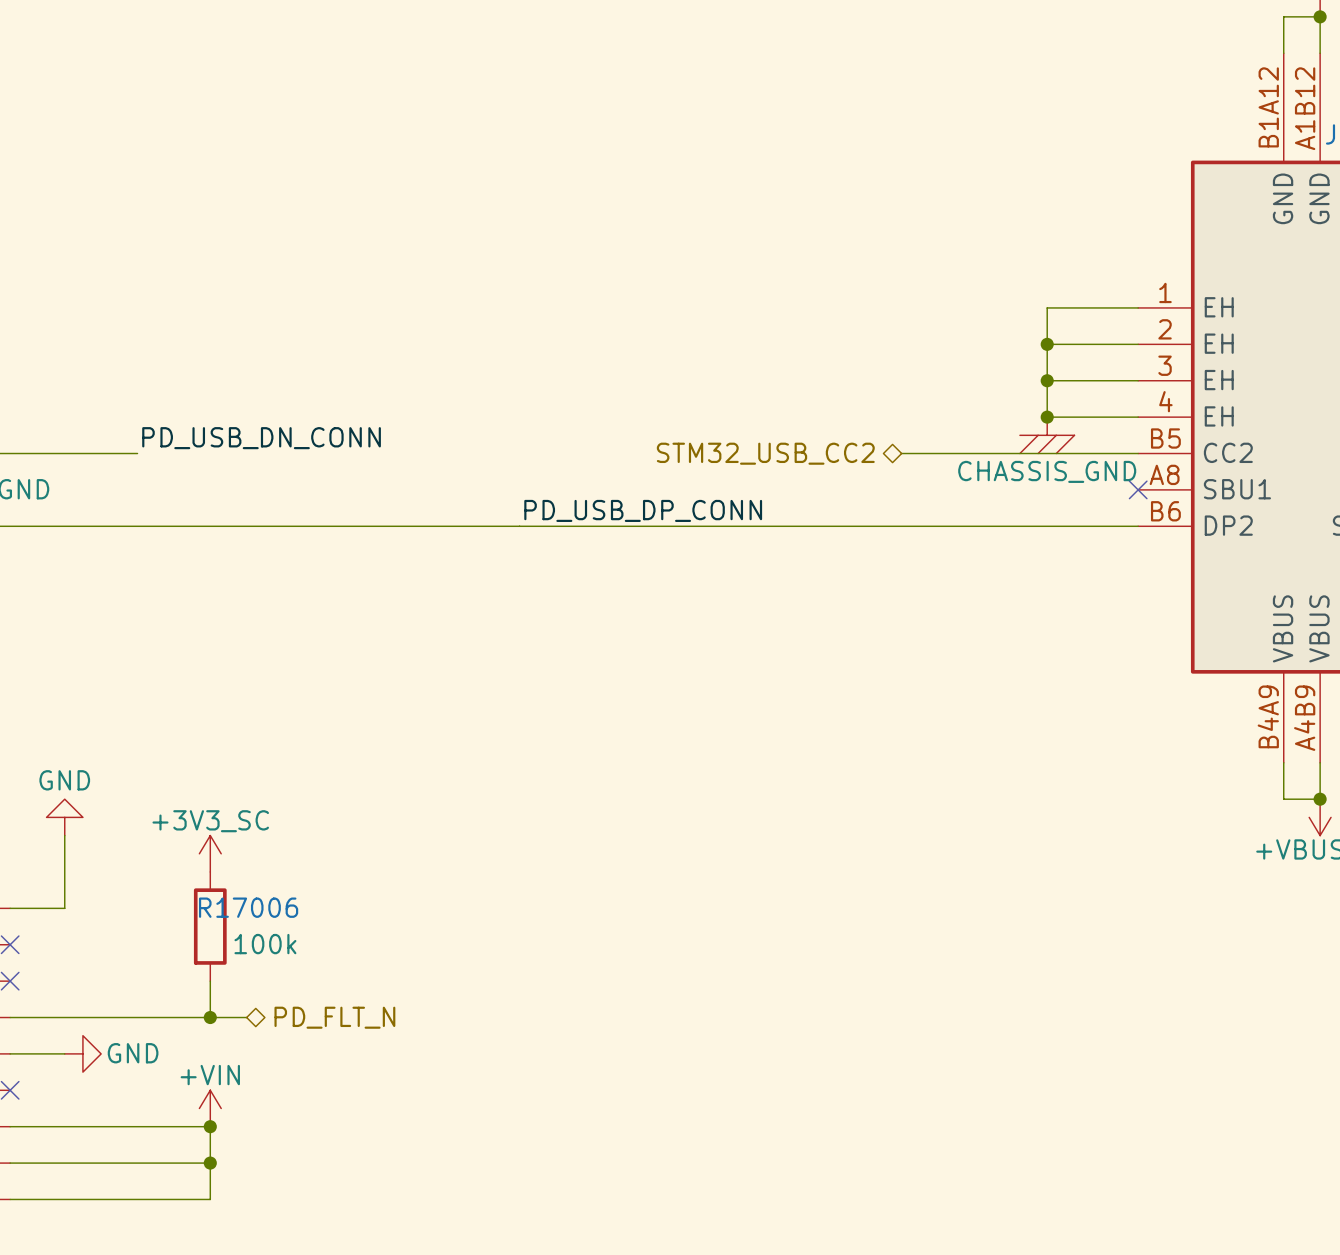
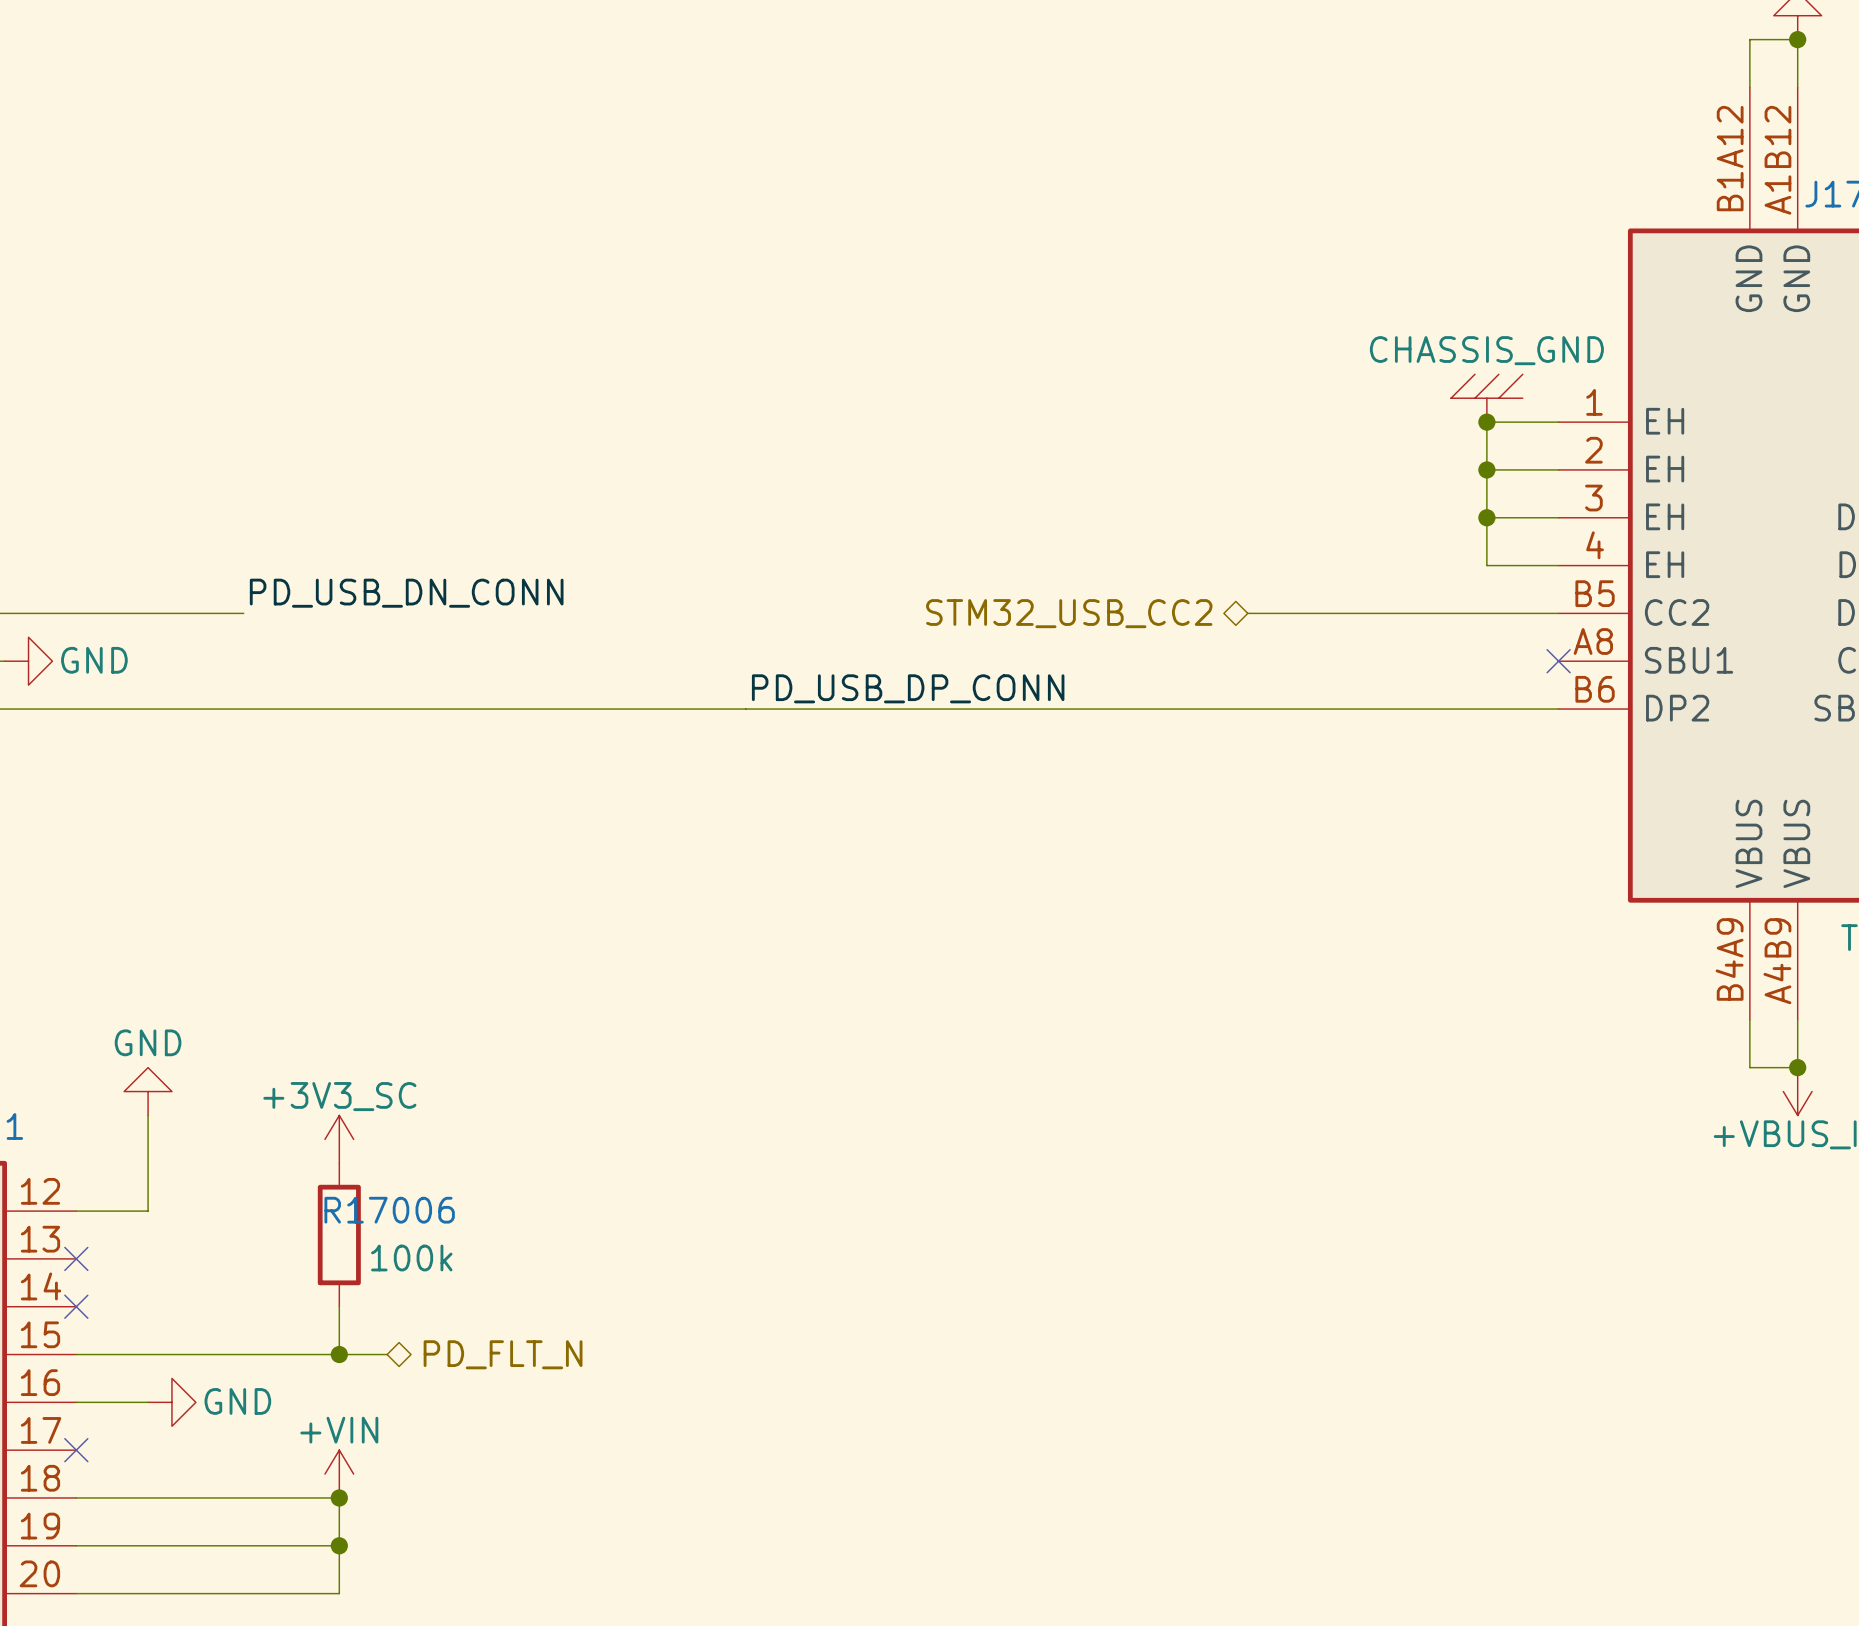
wire: (1083, 307) (1047, 307) (1047, 417) (1083, 417) -> (1486, 422) (1486, 565)
junction: none -> (1486, 422)
wire: (1047, 344) (1083, 344) -> none
junction: (1047, 344) -> none
junction: none -> (1486, 469)
wire: (1047, 380) (1083, 380) -> none
junction: (1047, 380) -> none
junction: none -> (1486, 517)
junction: (1047, 417) -> none
power symbol rotation: 0° (1047, 435) -> 180° (1486, 398)
power symbol position: CHASSIS_GND (1047, 435) -> CHASSIS_GND (1486, 398)

